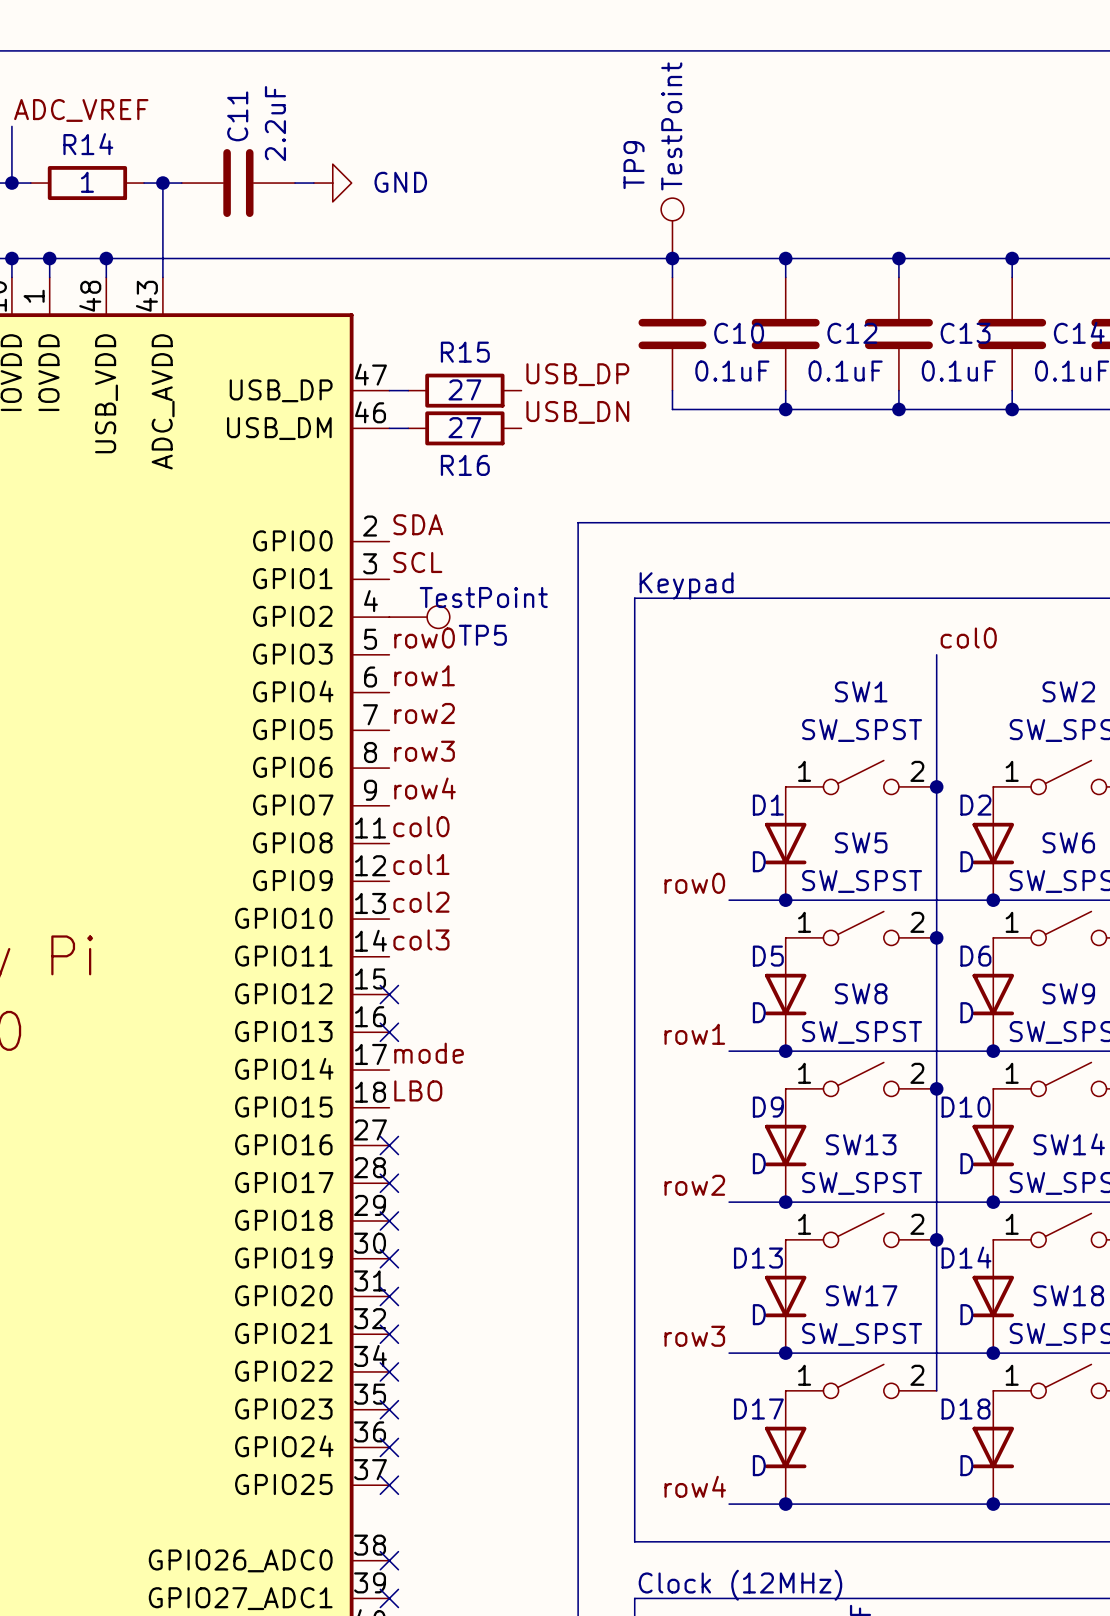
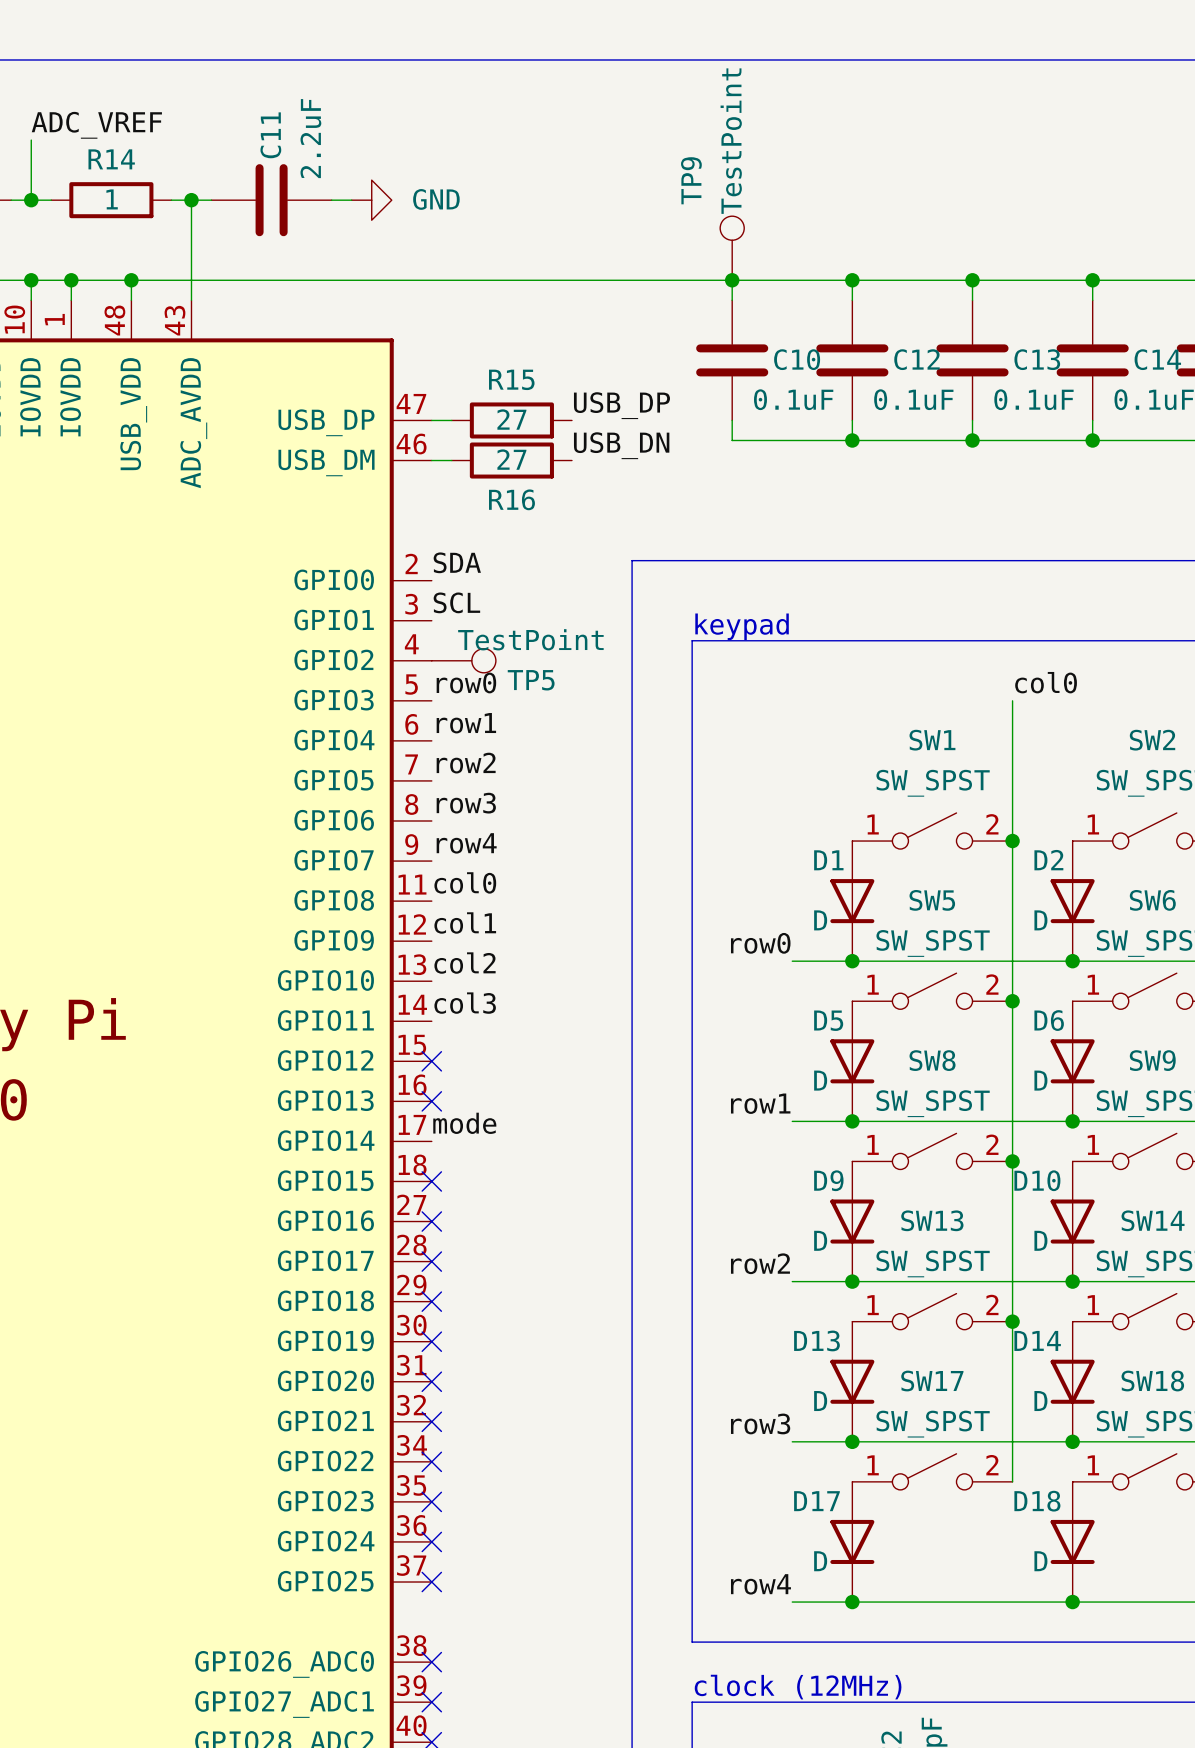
text: Keypad (686, 585) -> keypad (742, 626)
label: LBO (418, 1090) -> none
no-connect mark: none -> (431, 1181)
text: Clock (12MHz) (740, 1585) -> clock (12MHz) (798, 1687)

